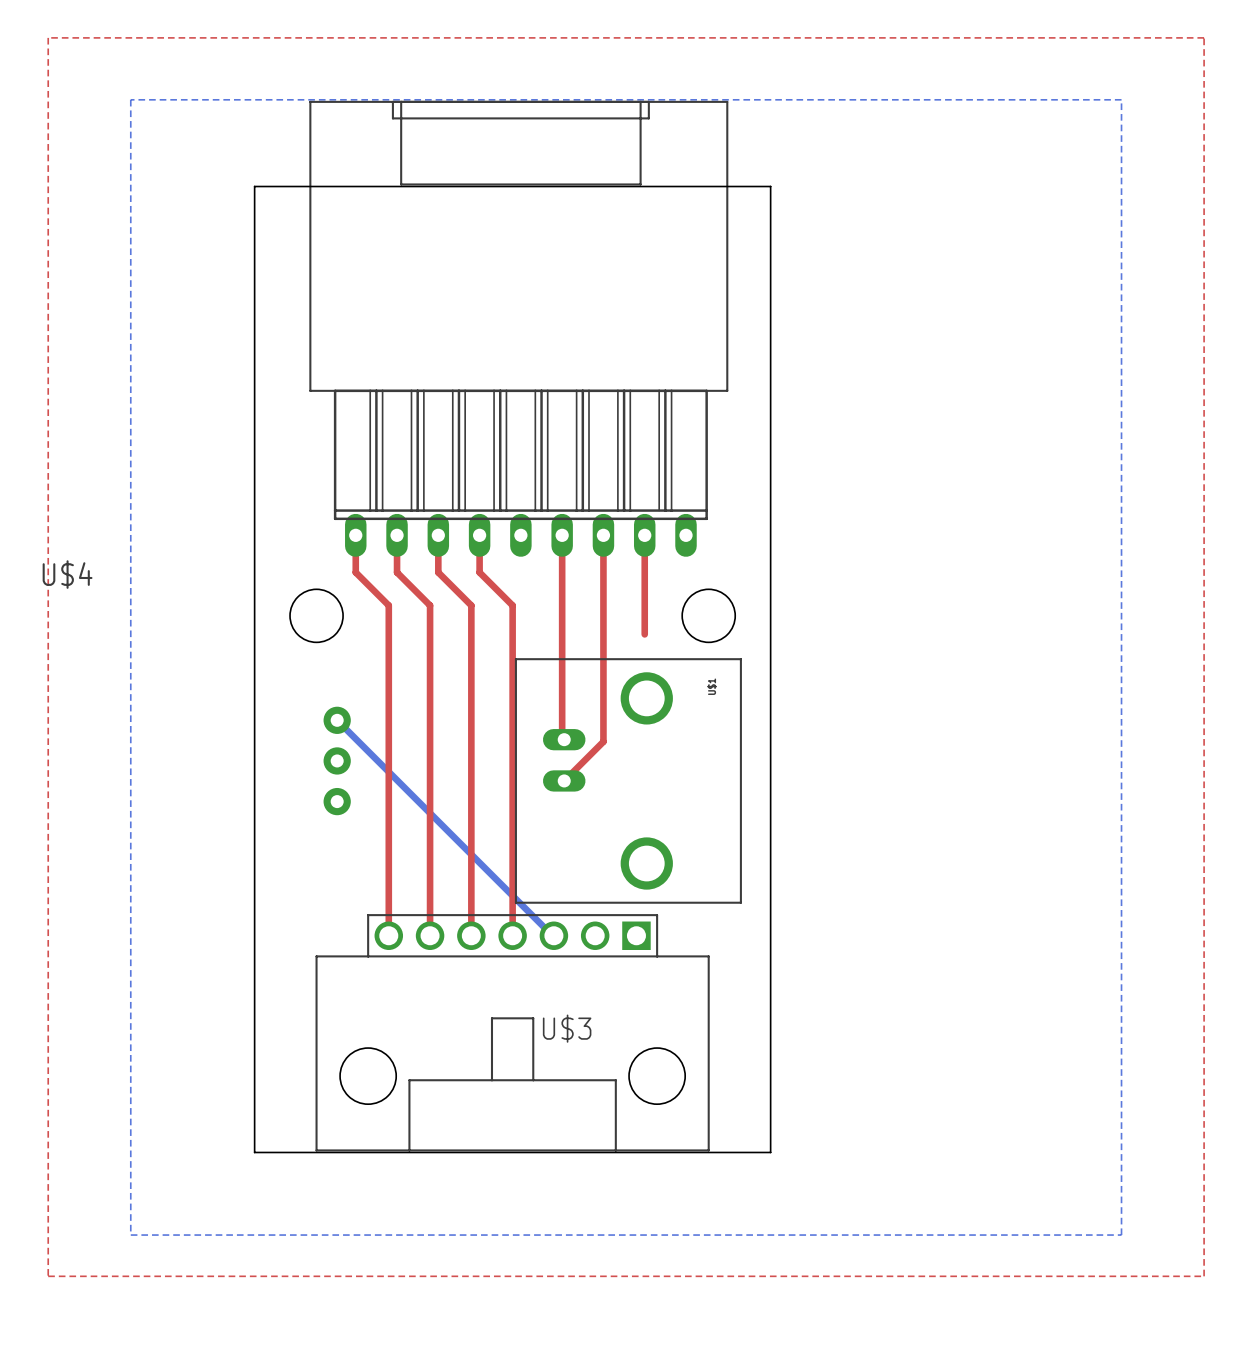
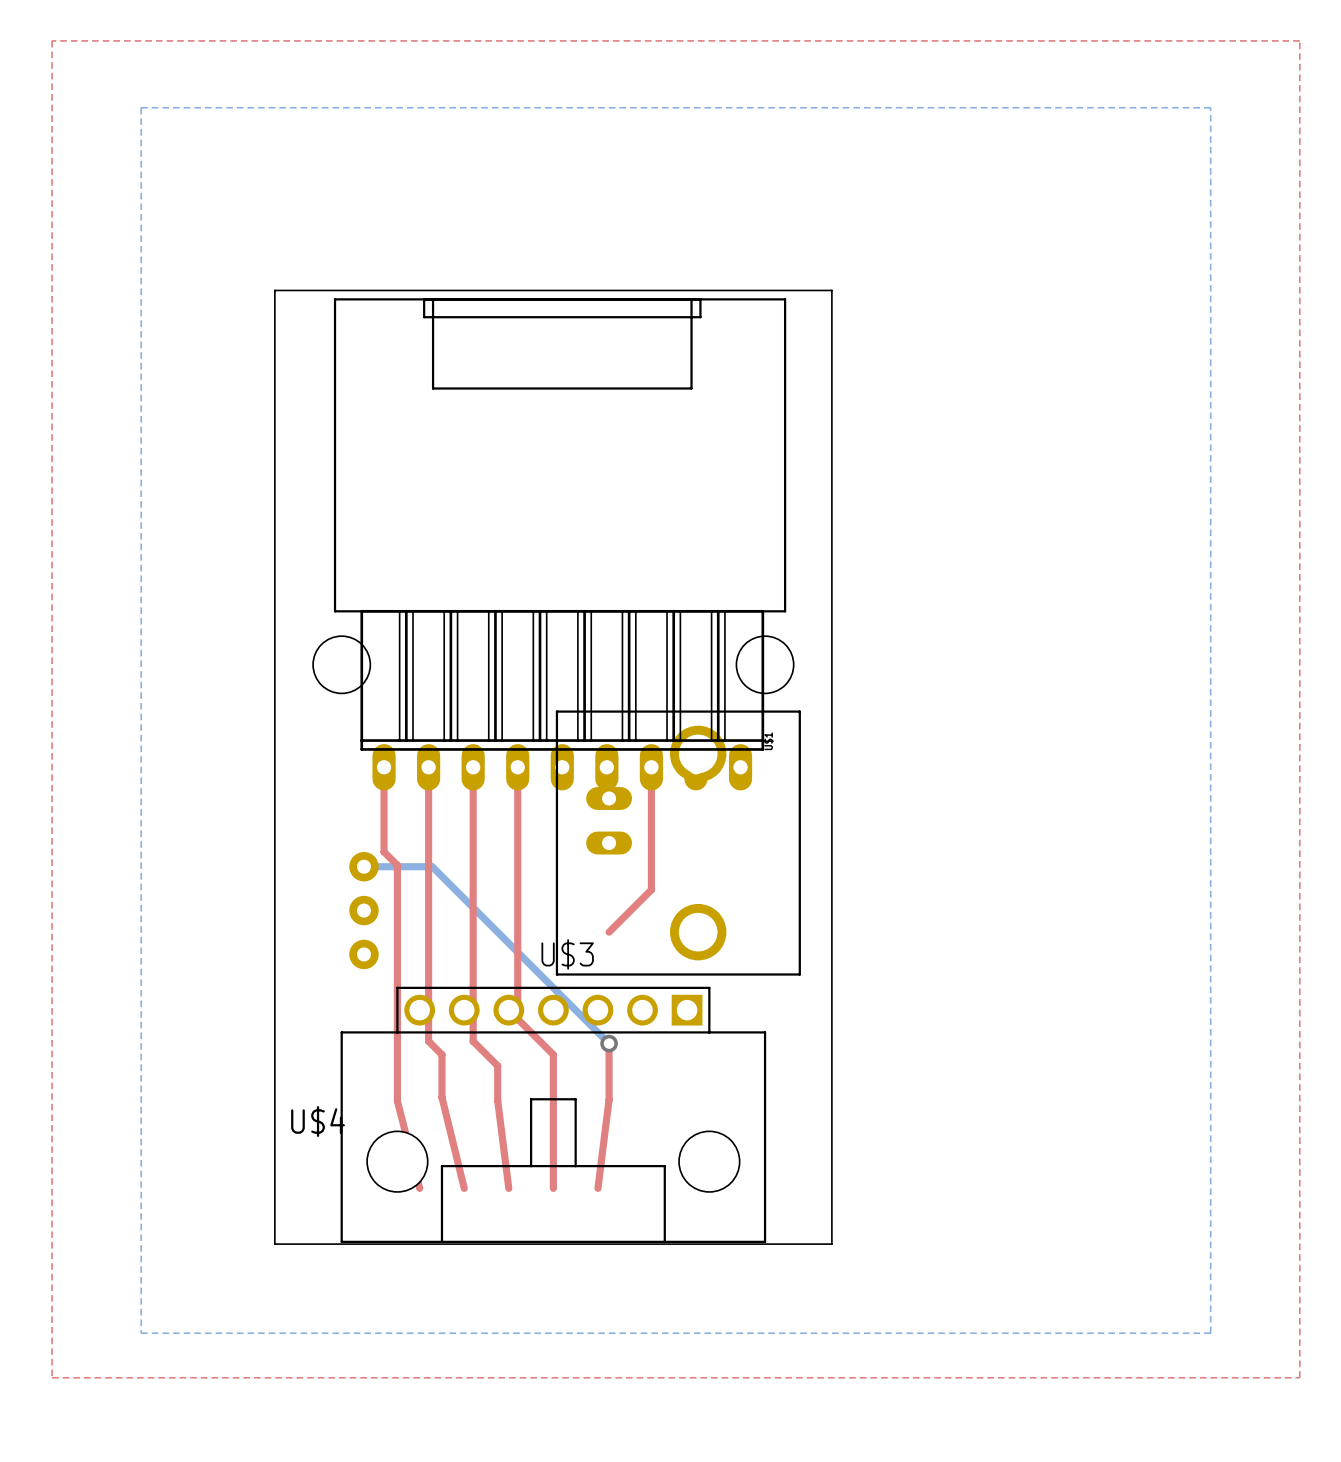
board edge: (254, 269) (254, 186) (770, 186) (770, 269) -> (274, 290) (831, 290)
U$4 position: (518, 328) -> (560, 544)
top track: (355, 535) (355, 572) (388, 605) (388, 935) -> none
top track: (397, 535) (397, 572) (430, 605) (430, 935) -> none
top track: (438, 535) (438, 572) (471, 605) (471, 935) -> none
top track: (479, 535) (479, 572) (512, 605) (512, 935) -> none
top track: (562, 535) (562, 710) -> none
top track: (603, 535) (603, 710) -> none
top track: (644, 535) (644, 634) -> none
U$4 name position: U$4 (67, 574) -> U$4 (318, 1121)
top track: none -> (384, 767) (384, 851) (397, 865) (397, 1101) (419, 1188)
top track: none -> (428, 767) (428, 1041) (441, 1054) (441, 1097) (464, 1188)
top track: none -> (473, 767) (473, 1041) (497, 1065) (497, 1100) (508, 1188)
top track: none -> (517, 767) (517, 1019) (553, 1054) (553, 1188)
bottom track: (337, 720) (553, 935) -> none
top track: (603, 741) (564, 780) -> (651, 800) (651, 889) (609, 932)
part position: (337, 760) -> (363, 910)
bottom track: none -> (363, 866) (432, 866) (609, 1043)
top track: none -> (609, 1043) (609, 1099) (597, 1188)
via: none -> (609, 1043)
U$3 name position: U$3 (567, 1028) -> U$3 (567, 954)

